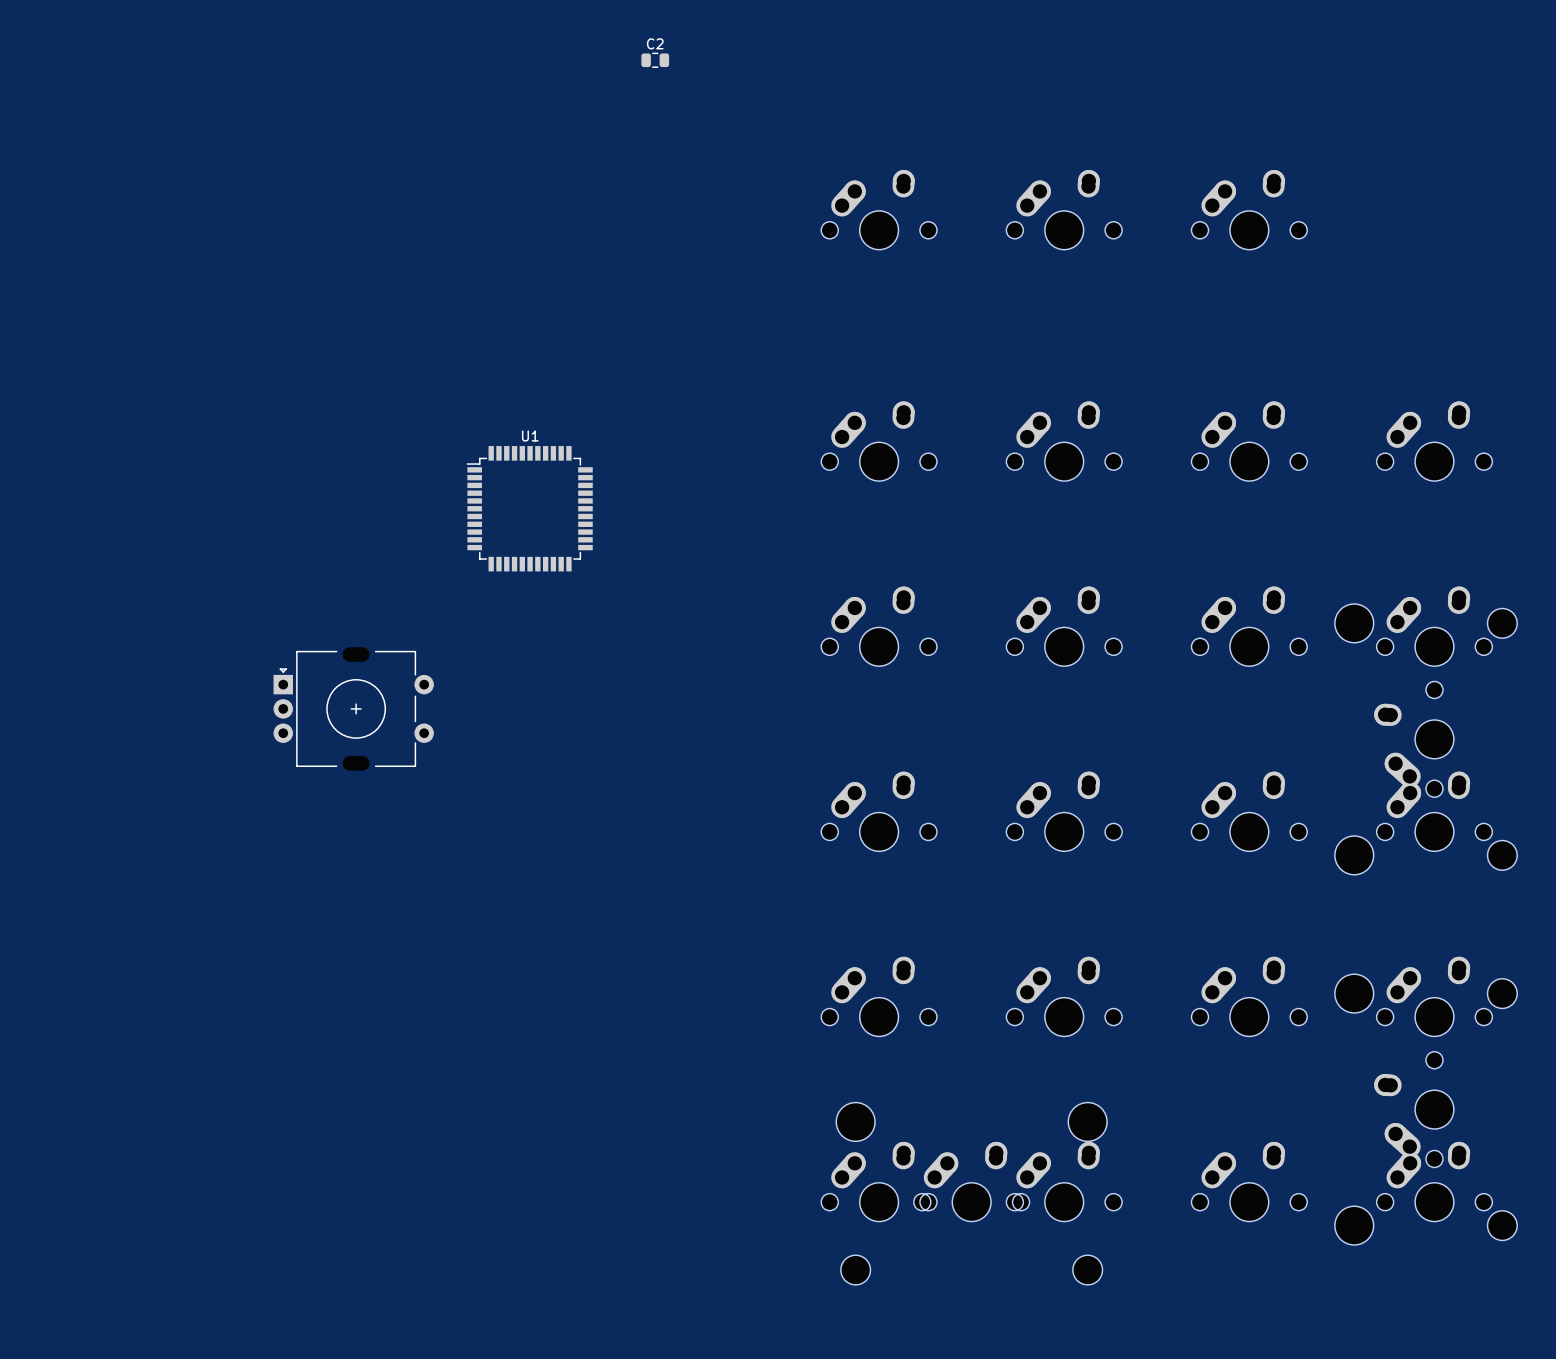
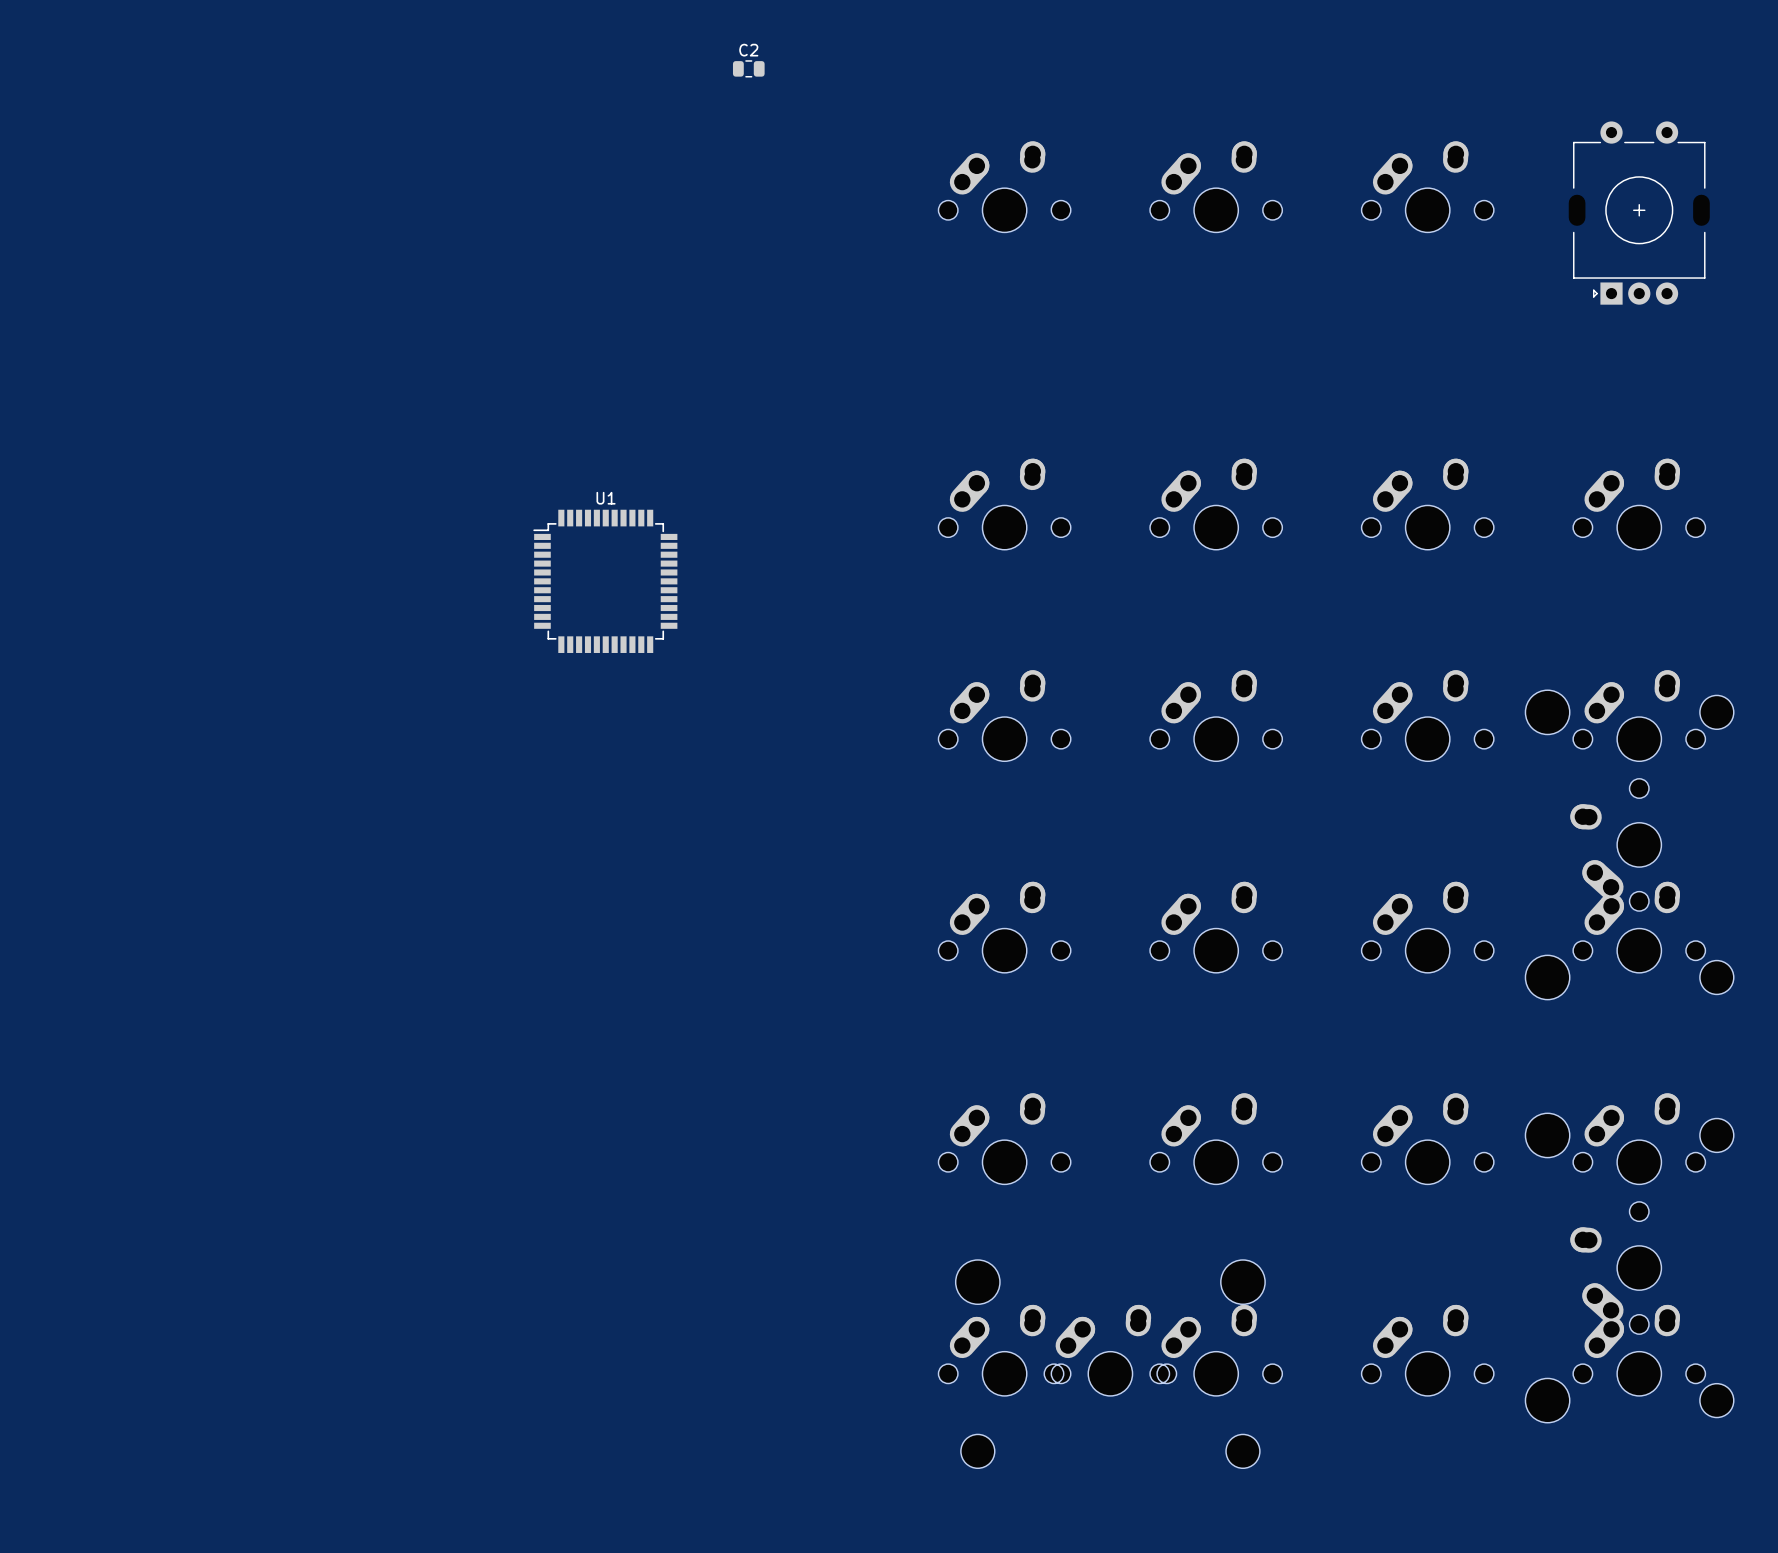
part: none -> (1639, 213)
part position: (879, 209) -> (1004, 186)
part position: (1064, 209) -> (1216, 186)
part position: (1249, 209) -> (1427, 186)
part: (353, 708) -> none

